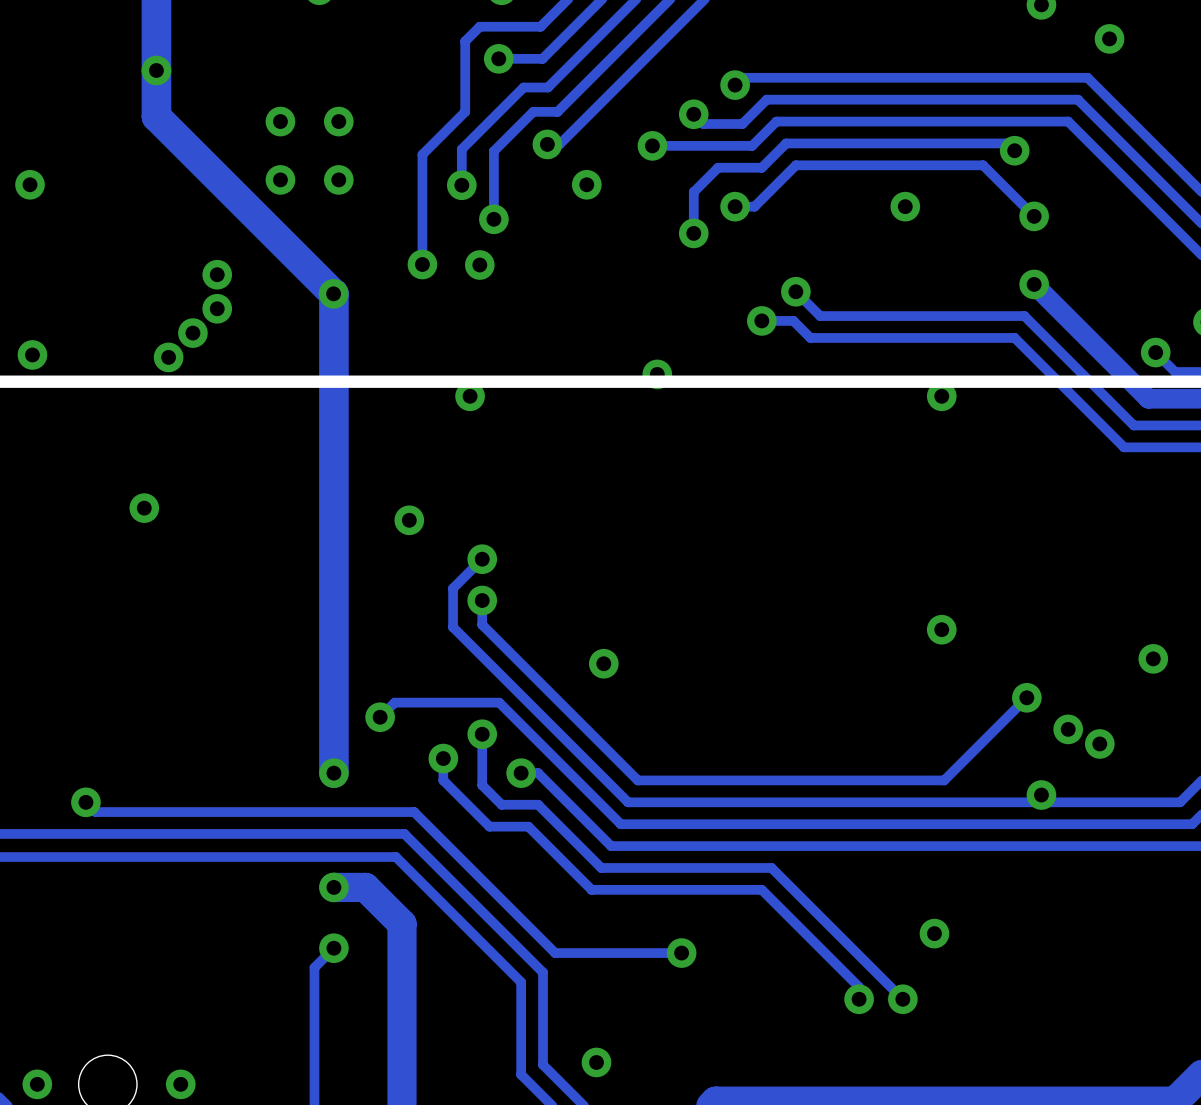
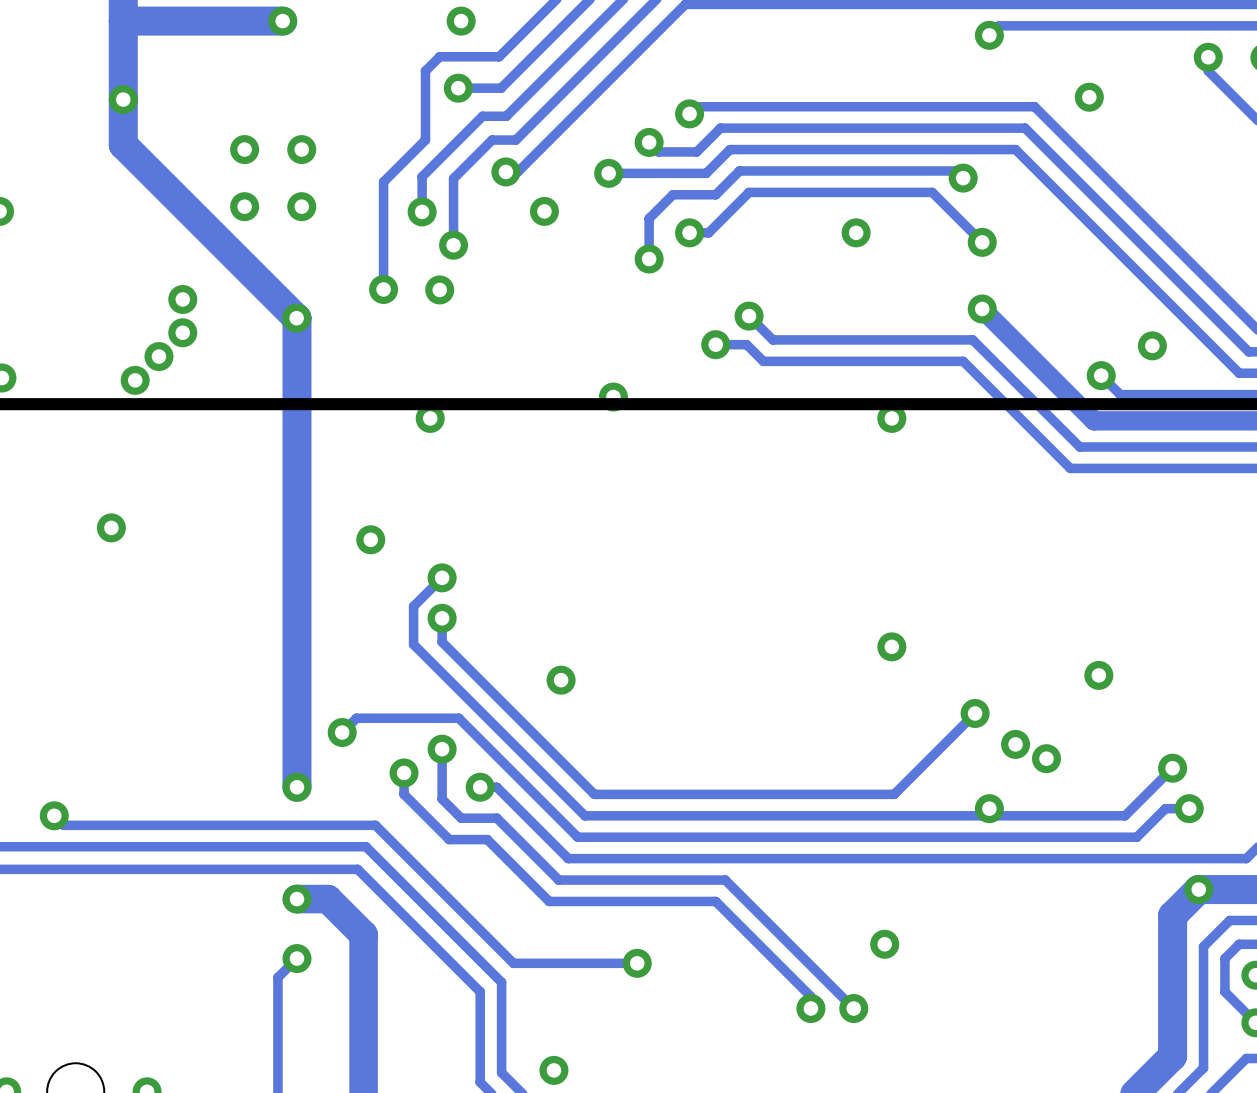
via position: (1109, 38) -> (1089, 97)

